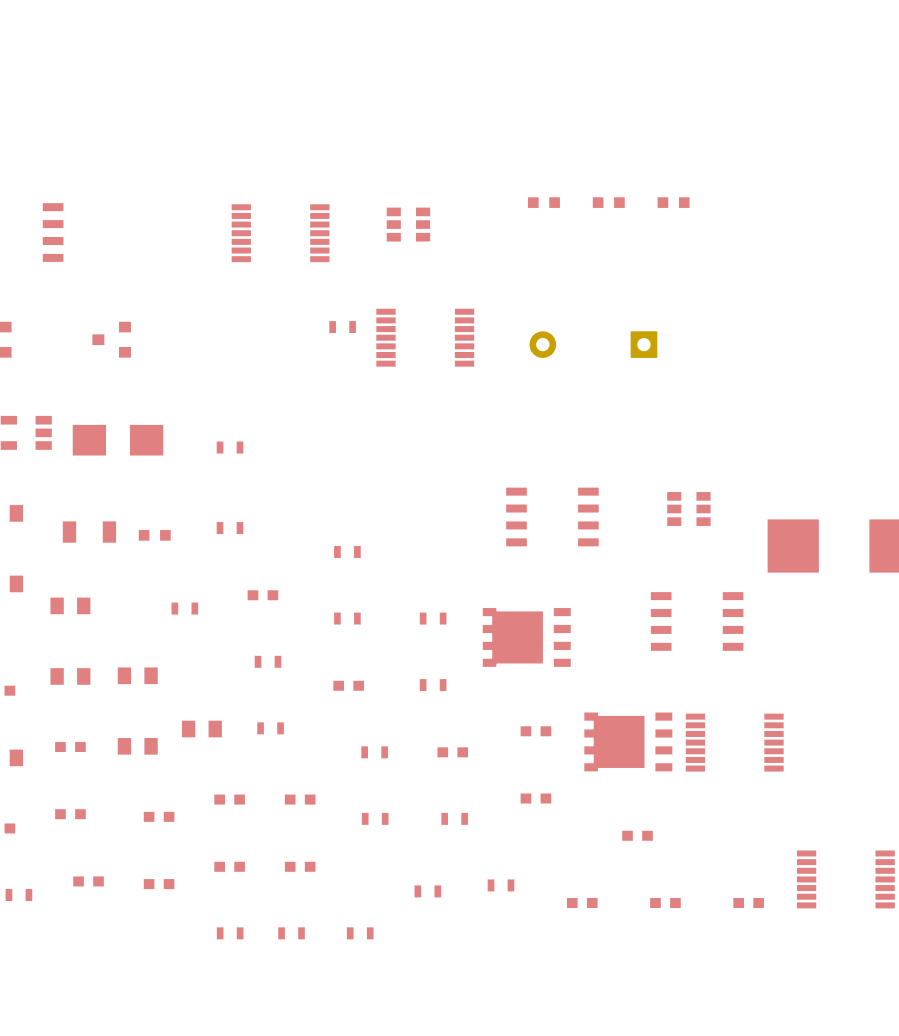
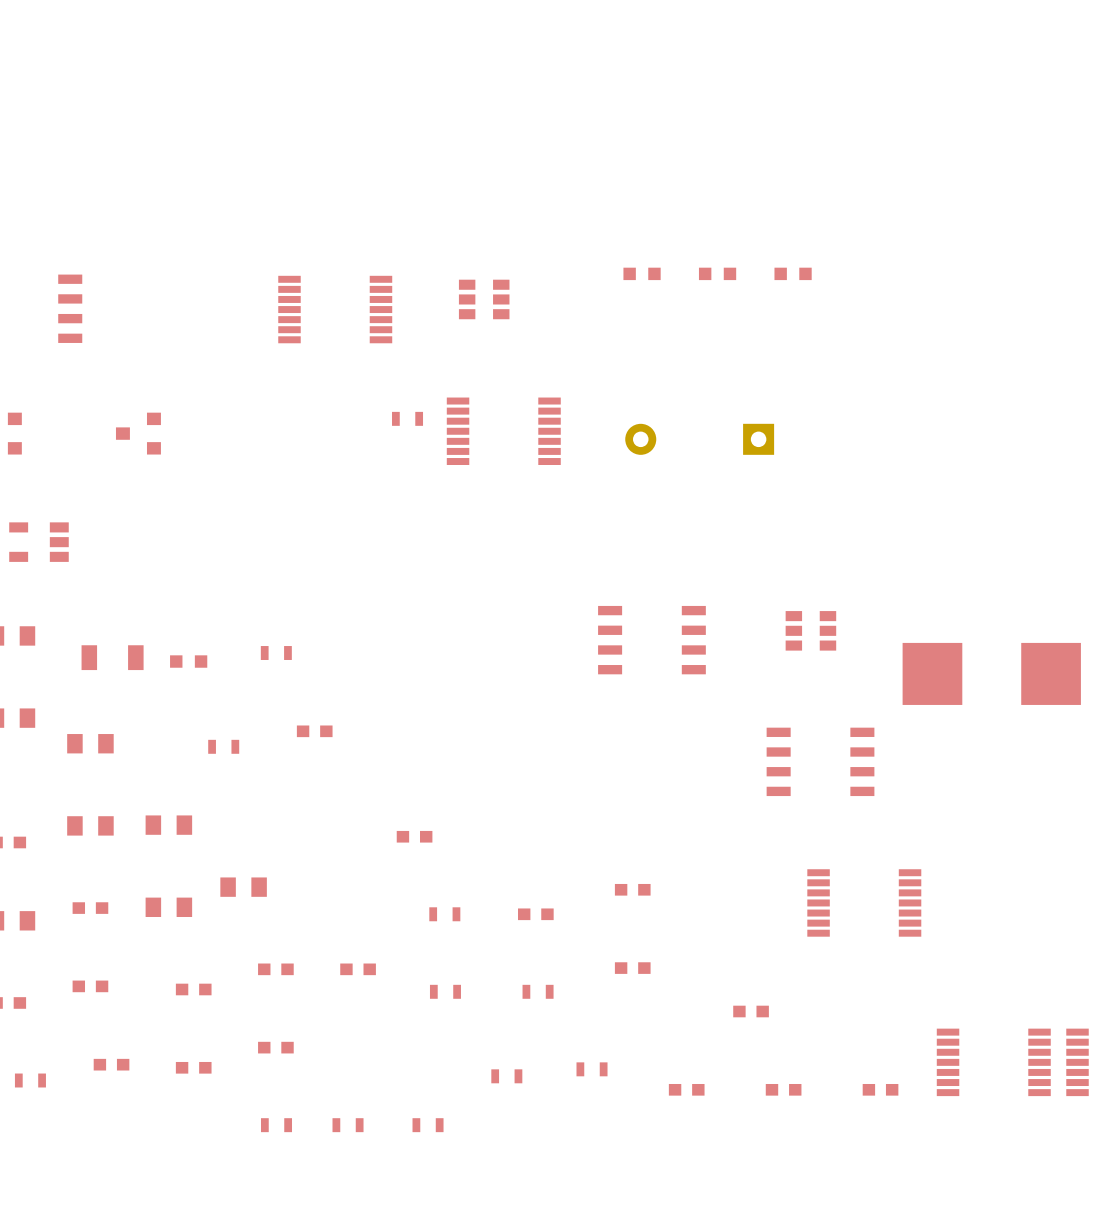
part: (117, 440) -> none
part: (230, 447) -> none
part: (347, 552) -> none
part: (347, 618) -> none
part: (433, 618) -> none
part: (526, 637) -> none
part: (268, 661) -> none
part: (433, 685) -> none
part: (270, 728) -> none
part: (628, 741) -> none
part: (300, 866) -> none

